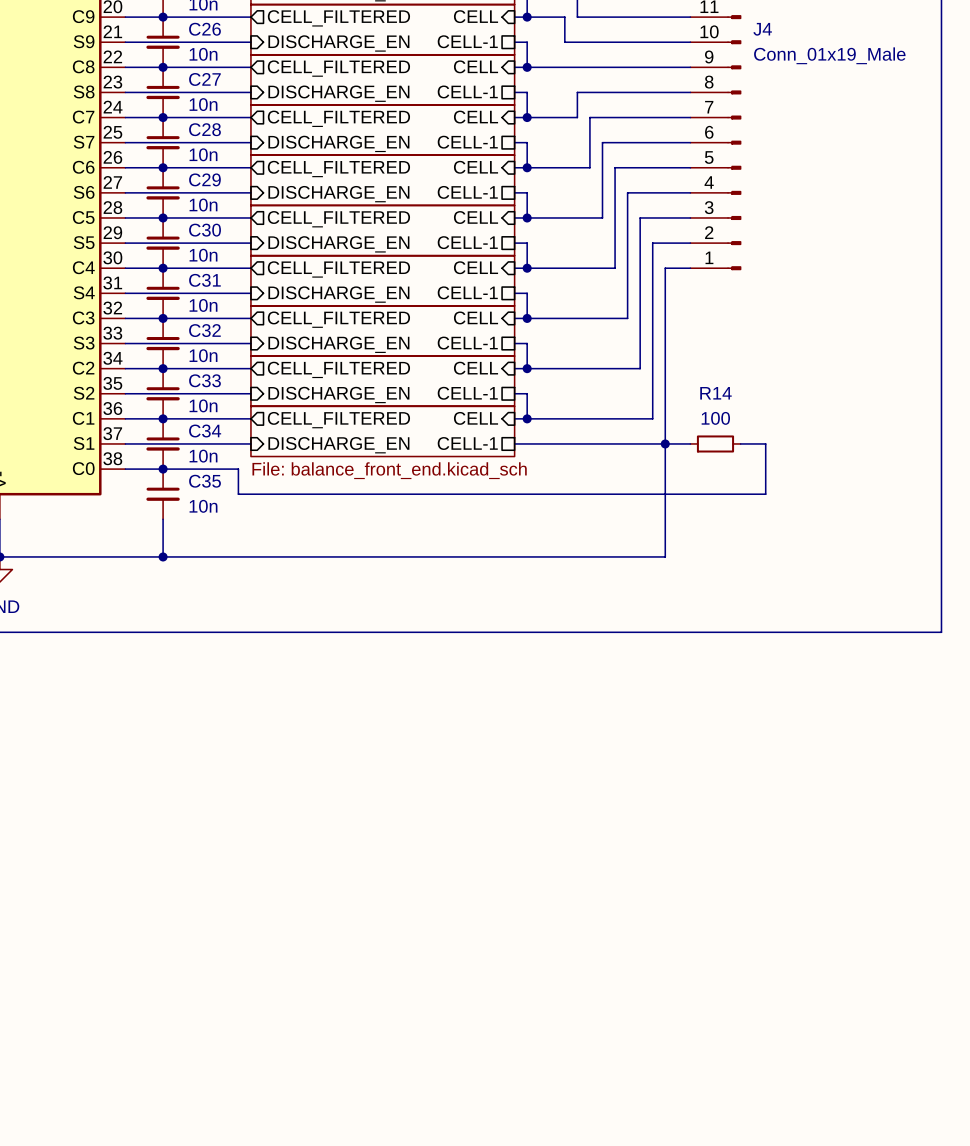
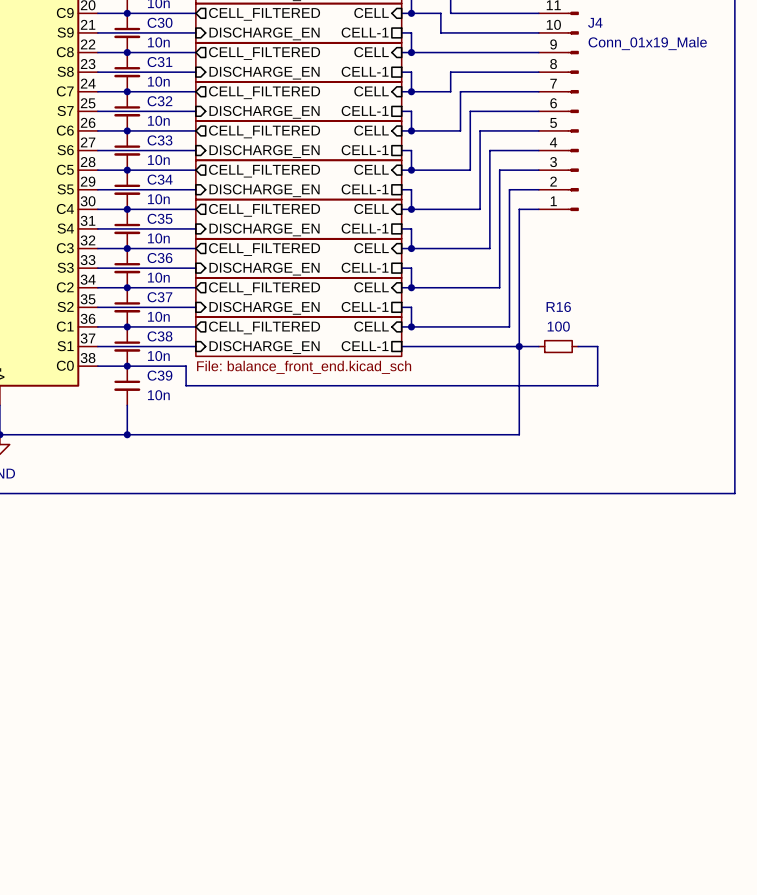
C26 name: C26 (204, 29) -> C30 (160, 22)
C27 name: C27 (204, 79) -> C31 (159, 62)
C28 name: C28 (204, 129) -> C32 (159, 101)
C29 name: C29 (204, 179) -> C33 (160, 140)
C30 name: C30 (205, 230) -> C34 (160, 179)
C31 name: C31 (204, 280) -> C35 (160, 218)
C32 name: C32 (204, 330) -> C36 (160, 258)
C33 name: C33 (204, 380) -> C37 (159, 297)
R14 name: R14 (715, 393) -> R16 (558, 306)
C34 name: C34 (205, 431) -> C38 (160, 336)
C35 name: C35 (205, 481) -> C39 (159, 375)

